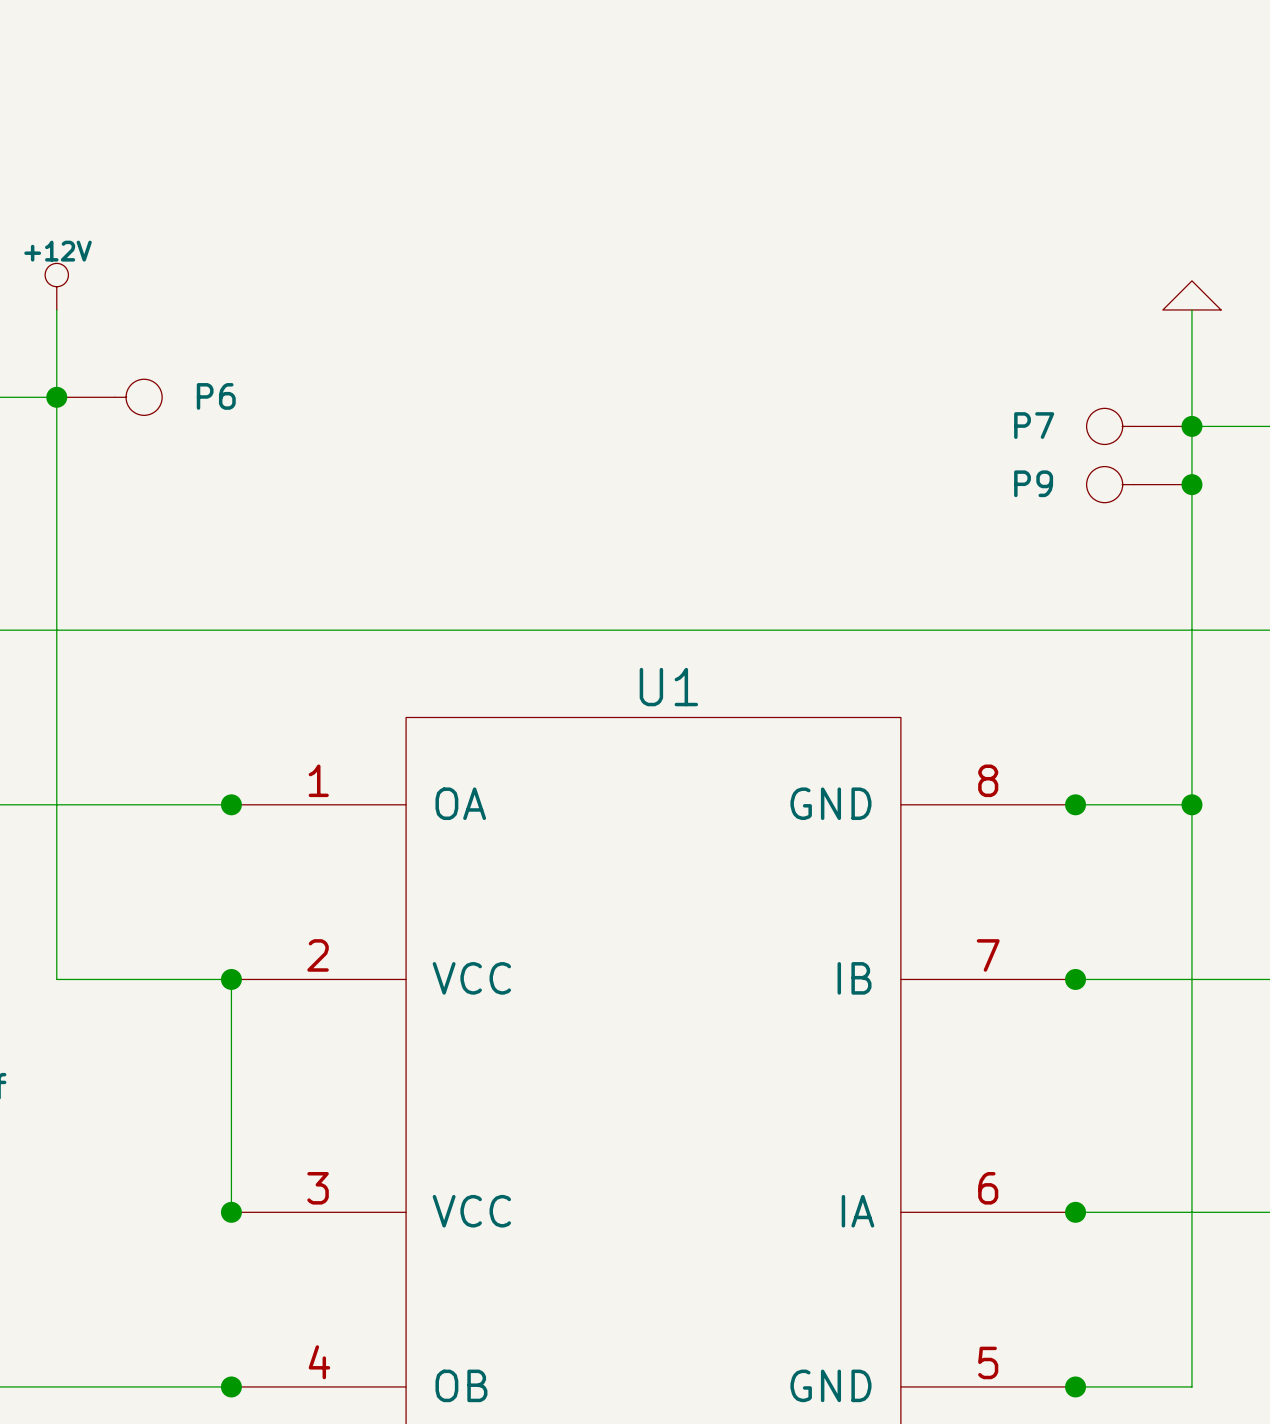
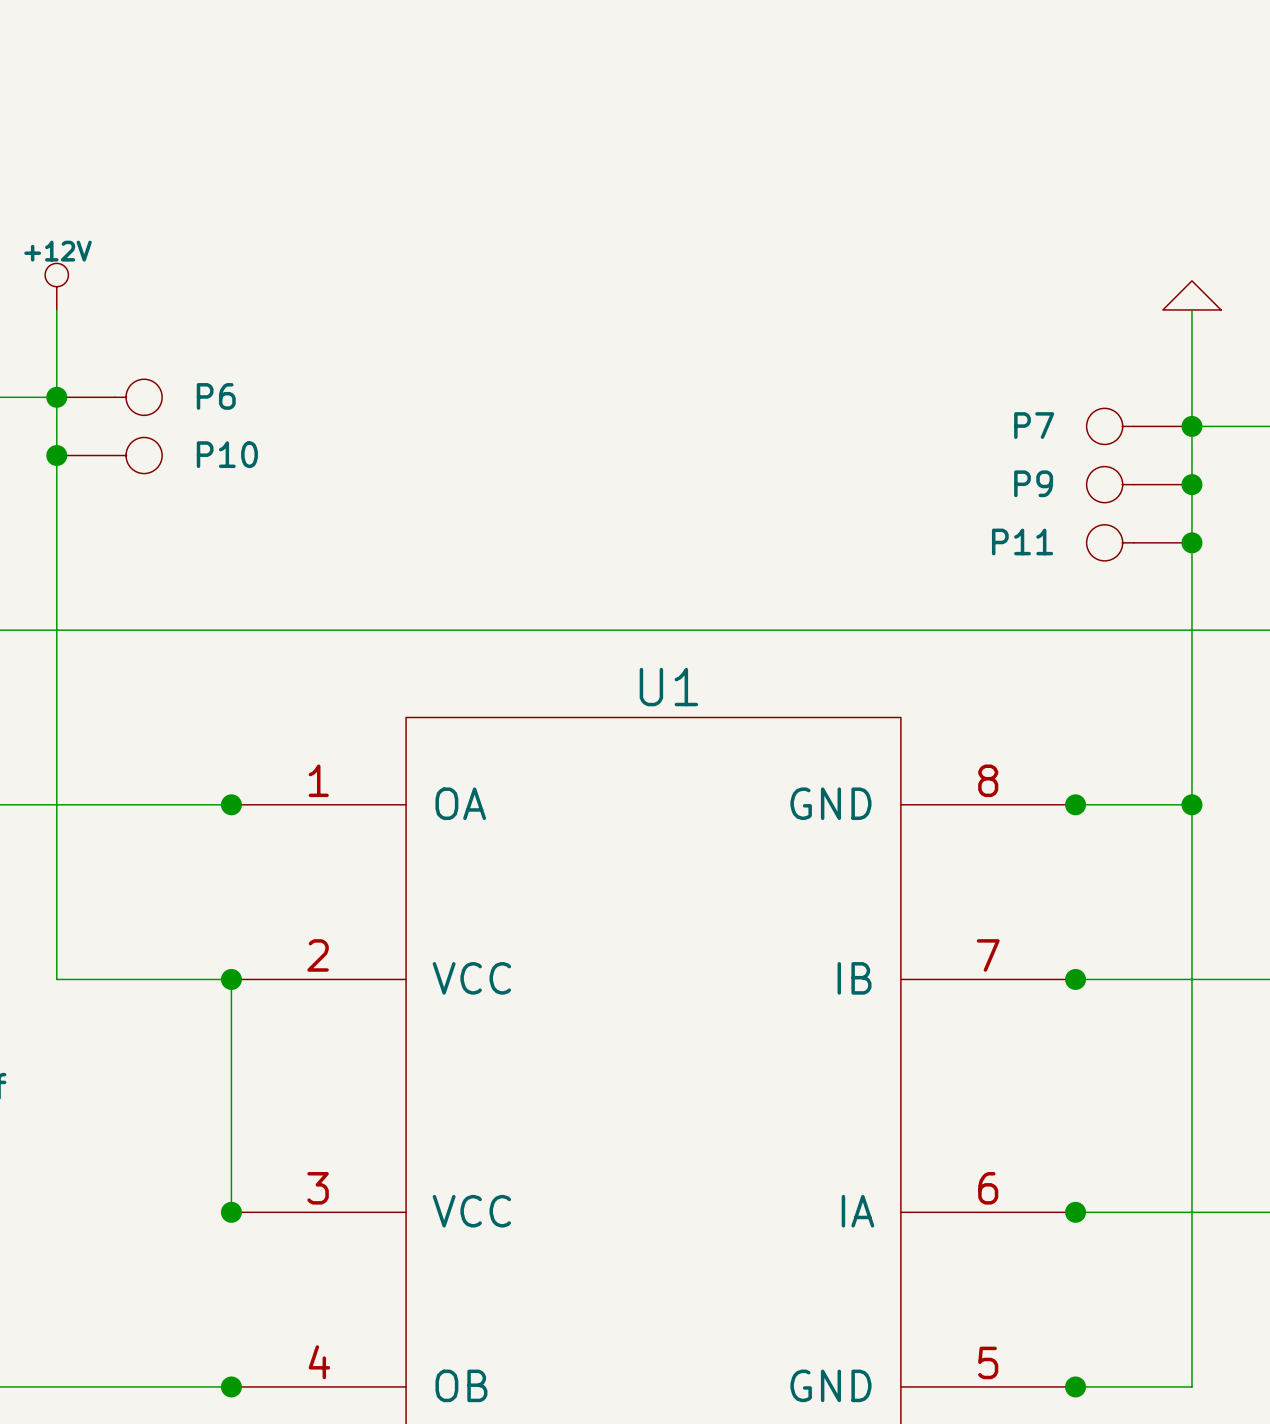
junction: none -> (56, 455)
P10: none -> (109, 455)
P11: none -> (1139, 542)
junction: none -> (1191, 542)

